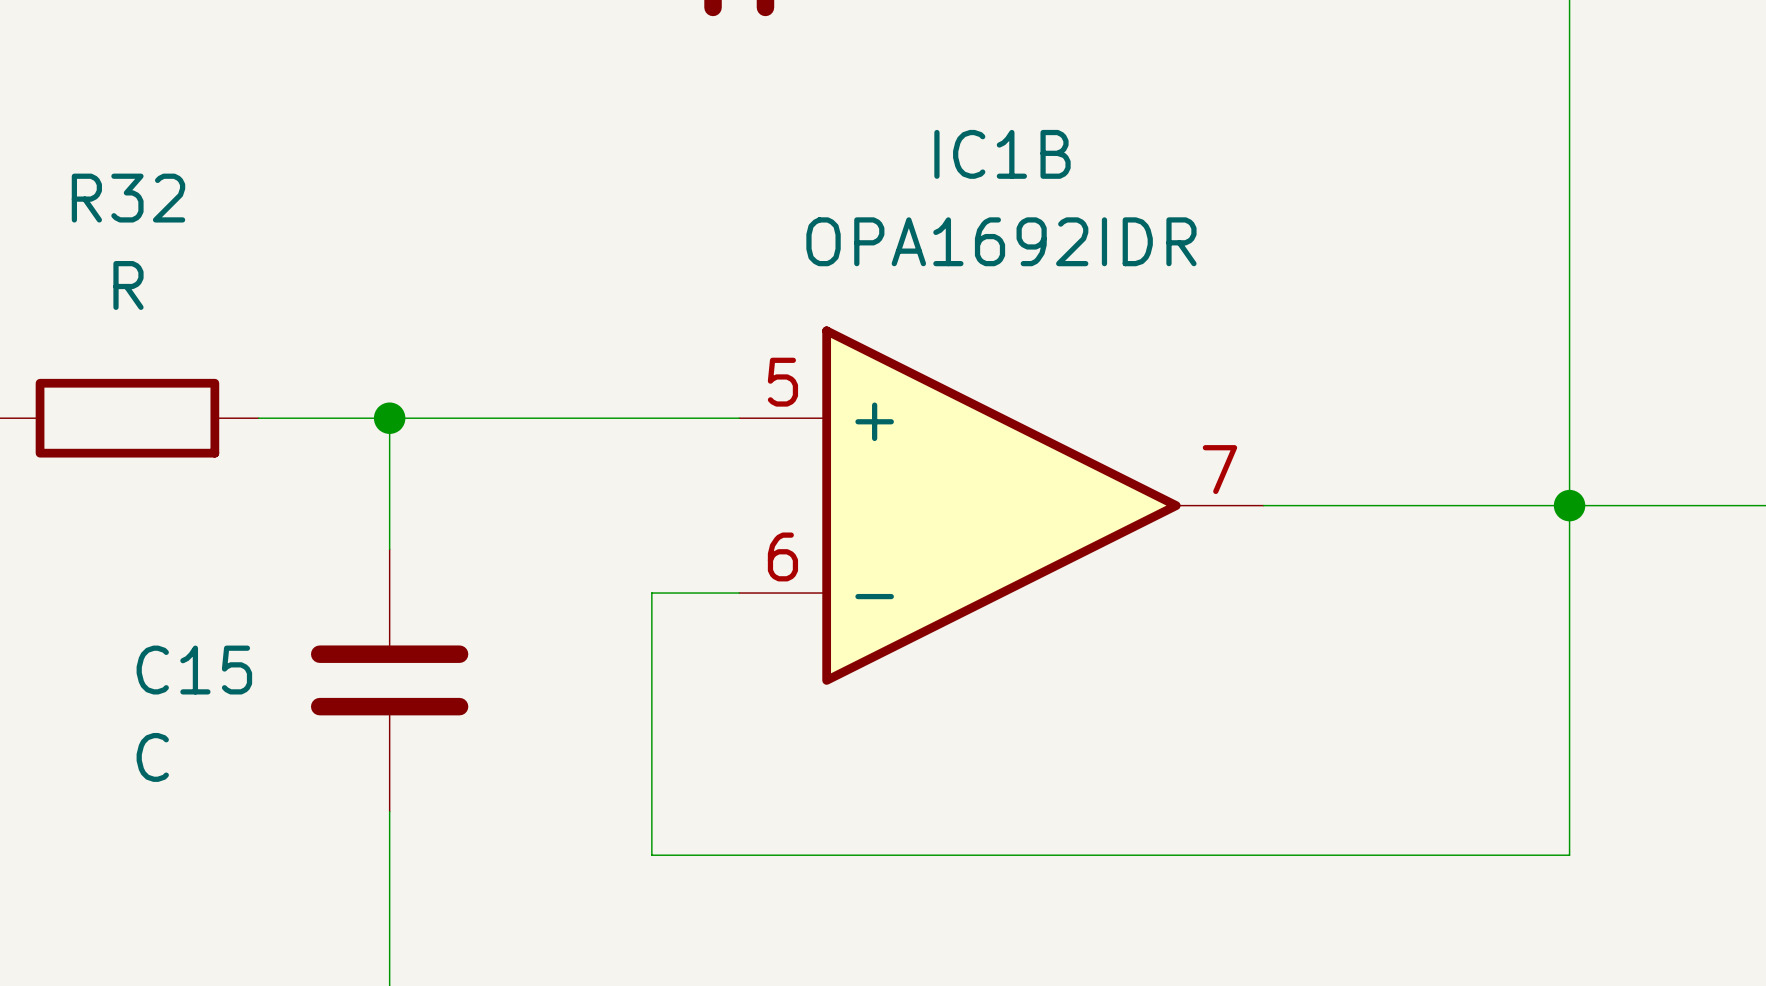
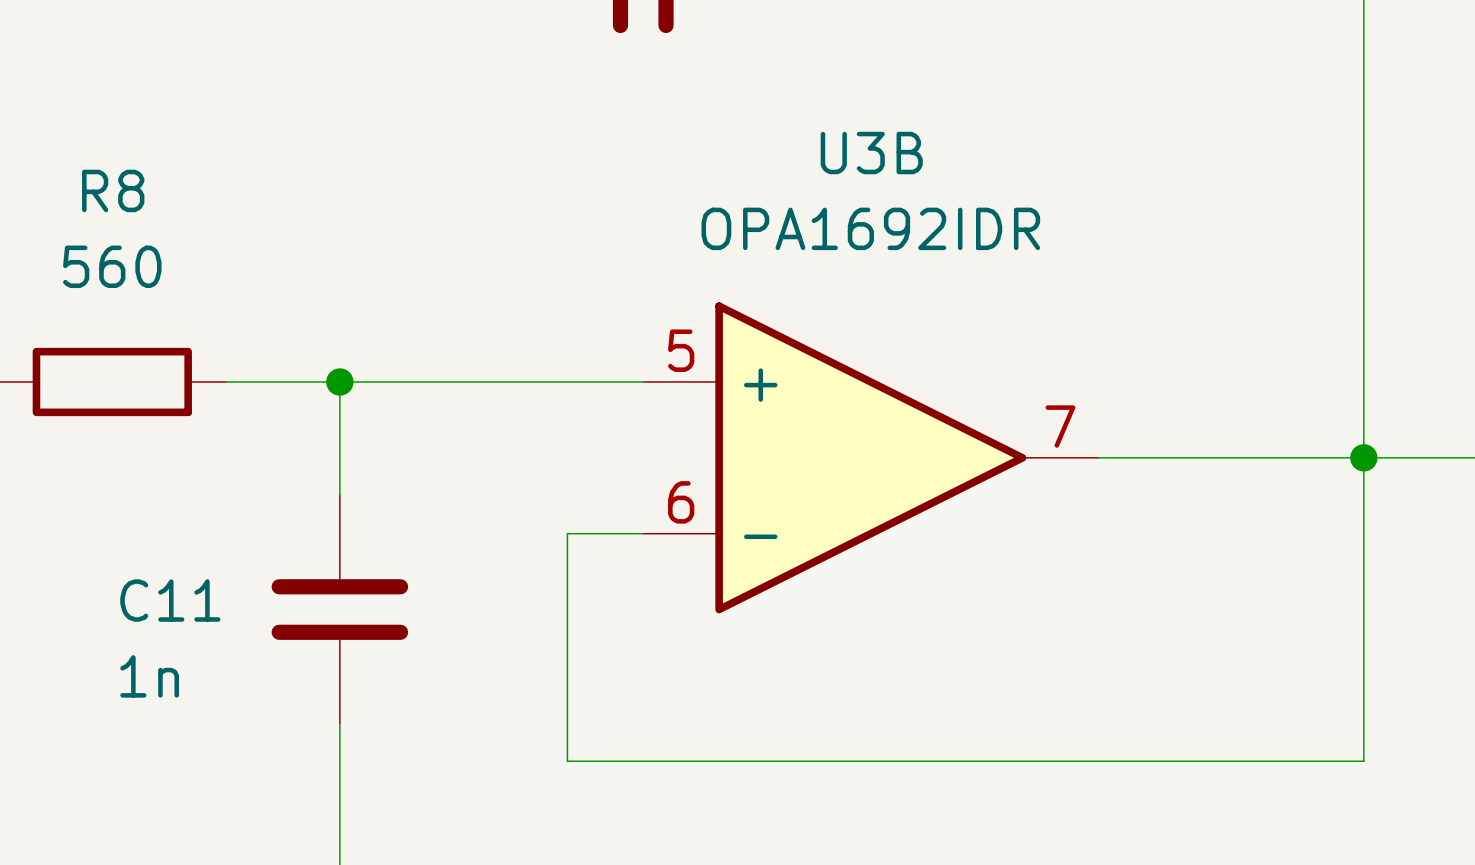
IC1B name: IC1B (1002, 154) -> U3B (871, 153)
R32 name: R32 (128, 198) -> R8 (113, 190)
R32 value: R (128, 285) -> 560 (112, 266)
C15 name: C15 (194, 670) -> C11 (170, 600)
C15 value: C (152, 757) -> 1n (149, 676)

